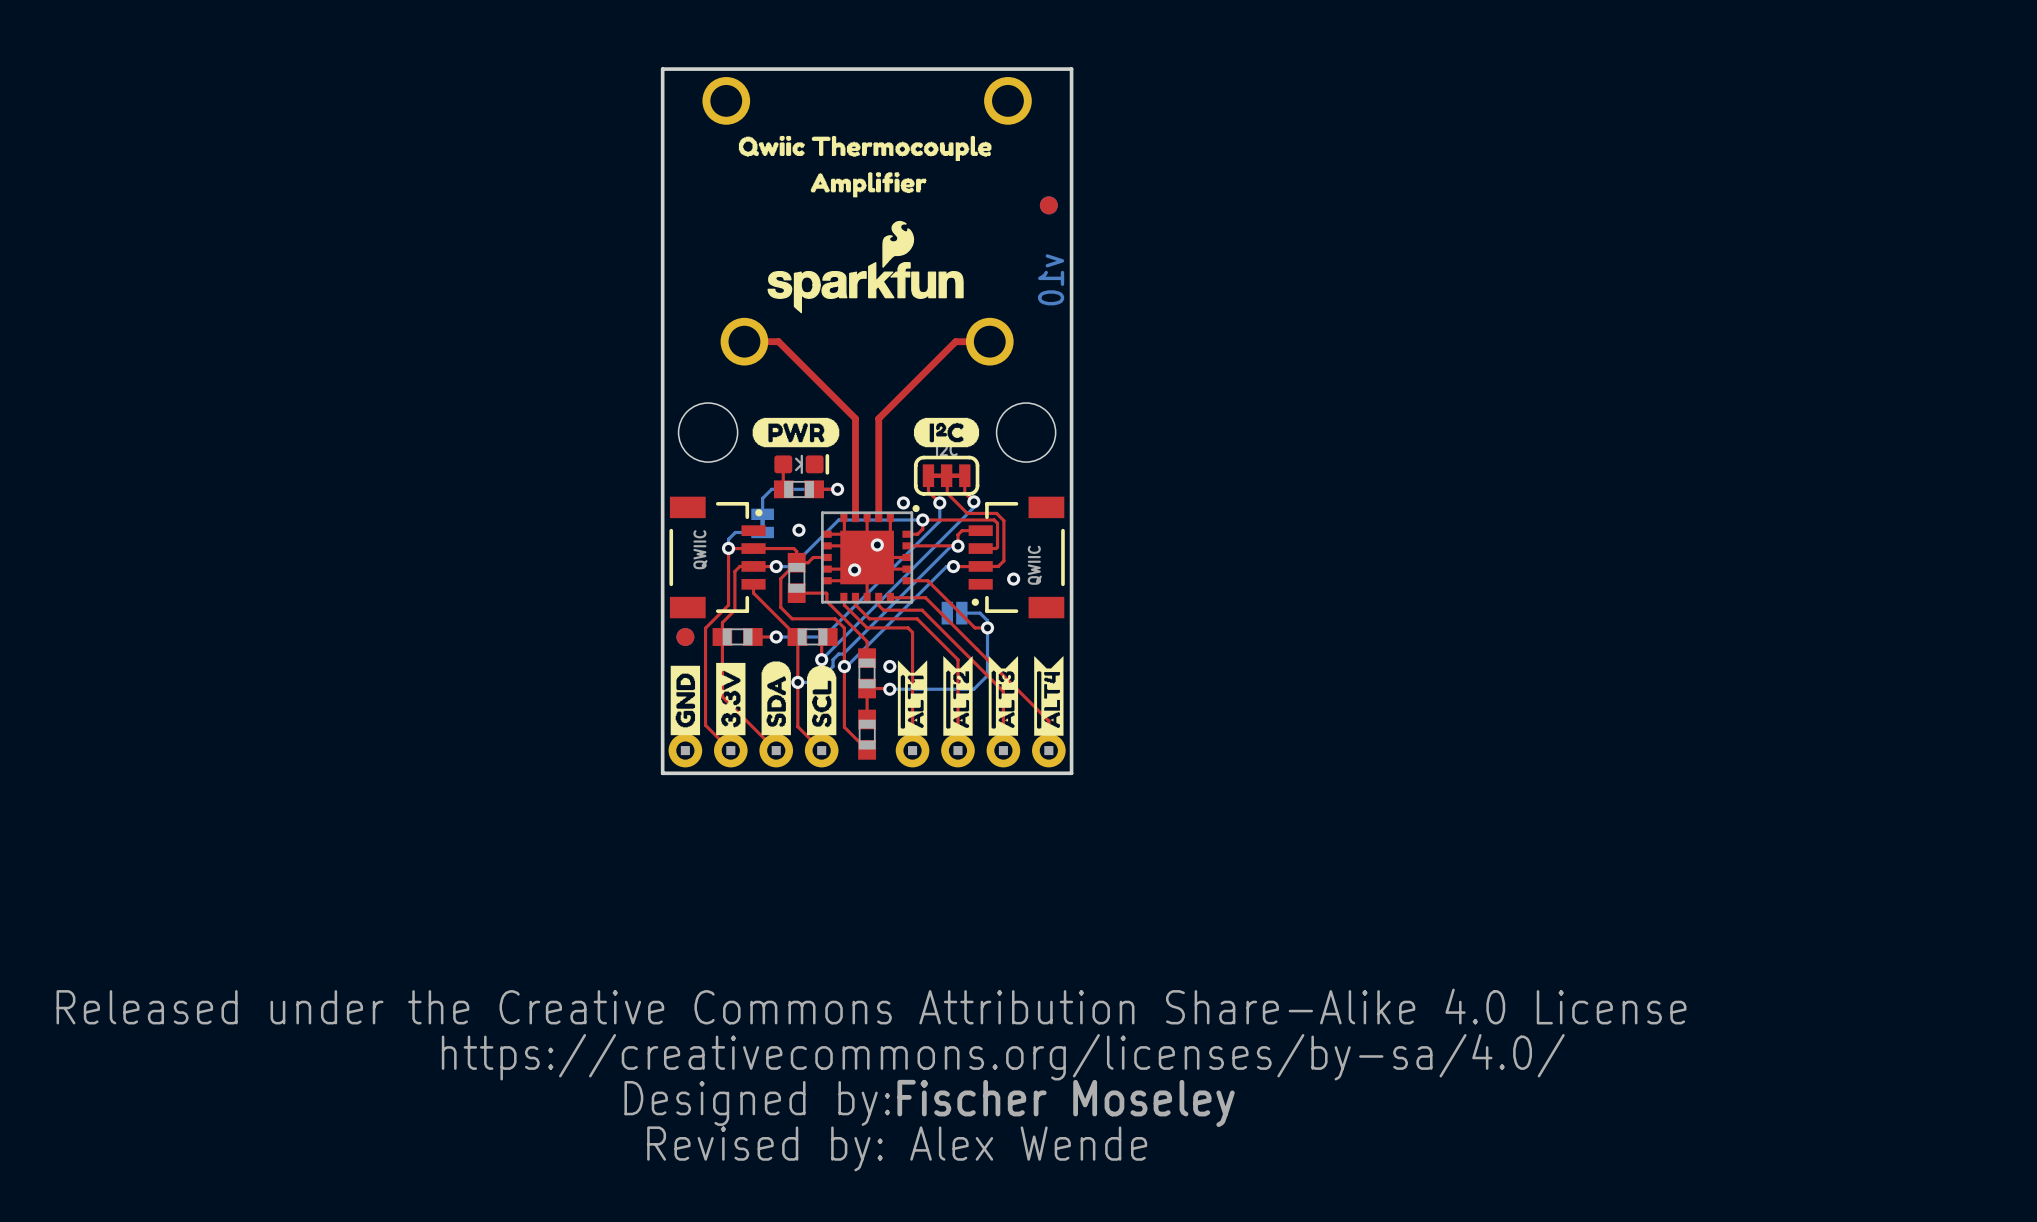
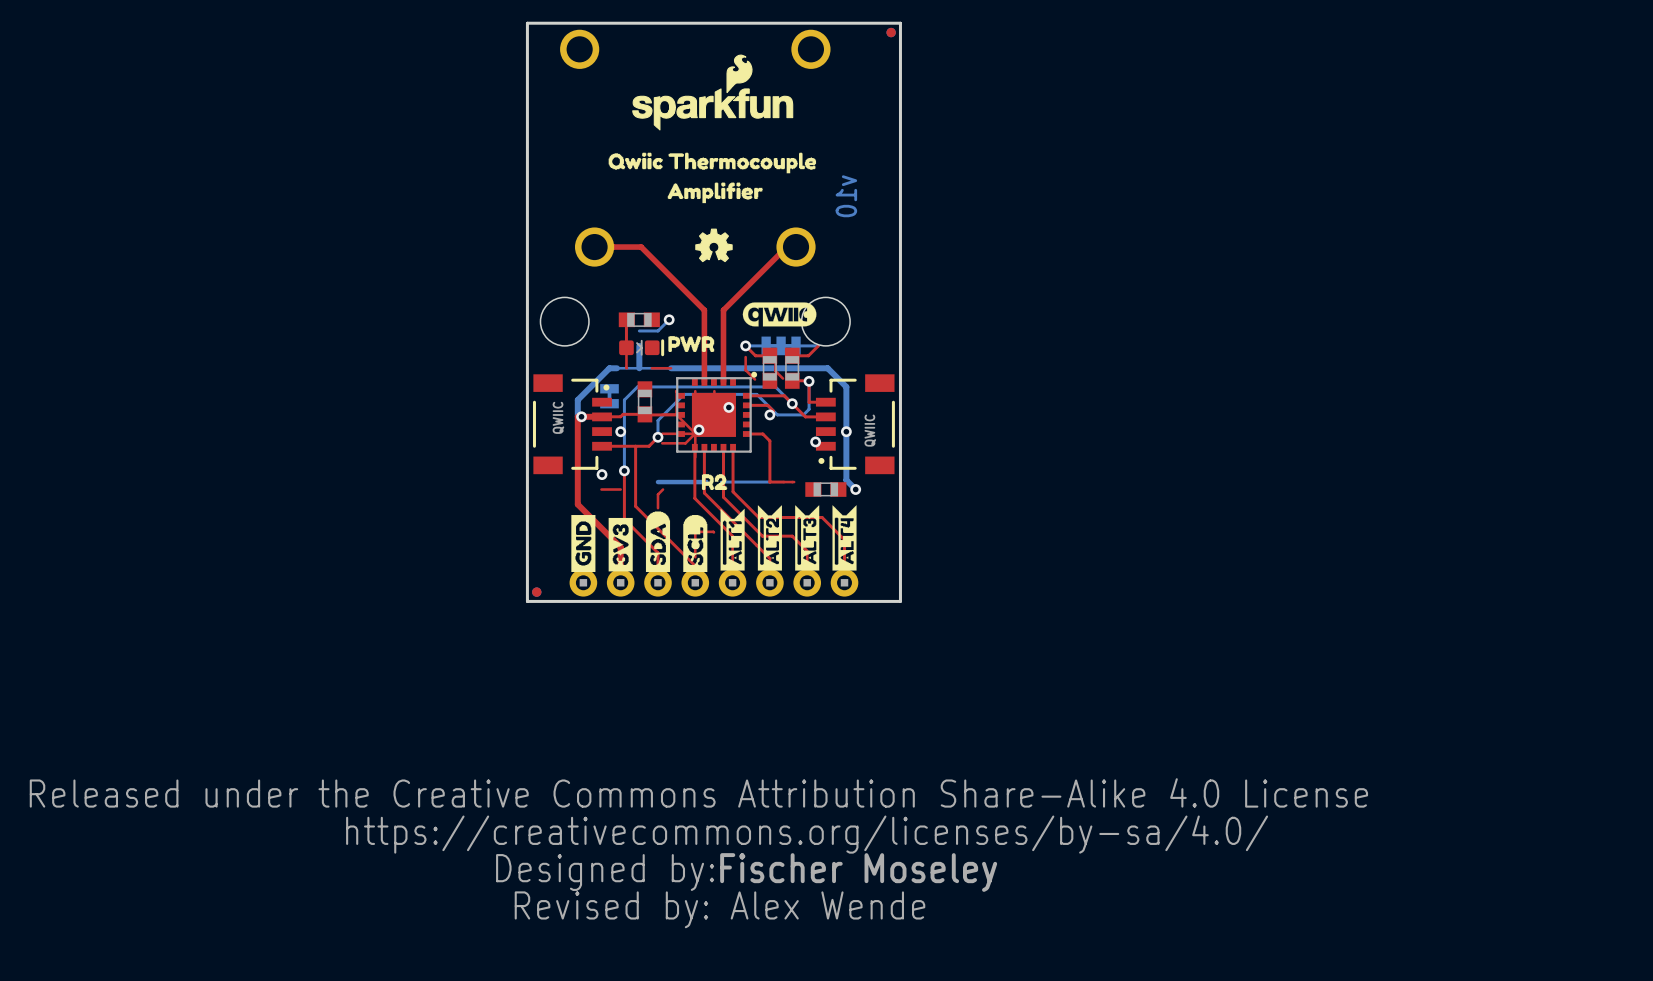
board edge: (1071, 69) (1071, 773) -> (863, 23) (900, 23) (900, 601) (863, 601)
part: none -> (891, 32)
drawing position: (865, 148) -> (712, 163)
drawing position: (868, 184) -> (715, 192)
part: (1048, 205) -> none
drawing position: (865, 267) -> (712, 92)
drawing: none -> [695, 228, 733, 263]
top track: (778, 341) (855, 418) (855, 517) -> (622, 247) (641, 247) (704, 310) (704, 381)
top track: (978, 341) (955, 341) (878, 418) (878, 517) -> (786, 247) (723, 310) (723, 381)
drawing: none -> [742, 302, 817, 327]
drawing: [752, 417, 840, 448] -> none
drawing: [913, 417, 980, 448] -> none
top track: none -> (626, 319) (626, 344)
part: none -> (639, 319)
bottom track: none -> (669, 319) (657, 330) (639, 330)
via: none -> (669, 319)
drawing: none -> [668, 336, 715, 352]
bottom track: none -> (639, 345) (639, 368)
top track: none -> (745, 345) (755, 355) (769, 355)
bottom track: none -> (745, 345) (766, 345)
via: none -> (745, 345)
bottom track: none -> (796, 345) (818, 345)
top track: none -> (818, 345) (808, 355) (792, 355)
top track: (946, 475) (947, 493) (967, 513) (996, 513) (1003, 520) (1003, 560) (998, 566) (953, 566) -> none
part side: top (946, 475) -> bottom (781, 345)
bottom track: (771, 489) (762, 498) (762, 514) -> (616, 368) (609, 368) (577, 399) (577, 416)
part: (798, 489) -> none
bottom track: none -> (671, 368) (827, 368) (846, 386) (846, 480) (855, 489)
via: (837, 489) -> none
part: none -> (769, 368)
part: none -> (792, 368)
bottom track: (973, 501) (973, 507) (821, 659) -> none
via: (973, 501) -> none
via: (903, 502) -> none
bottom track: (939, 502) (939, 521) (823, 636) (776, 636) -> none
via: (939, 502) -> none
top track: none -> (792, 380) (809, 380) (809, 402) (825, 402)
bottom track: none -> (809, 381) (809, 409) (803, 414) (777, 414) (756, 394) (684, 394) (657, 420) (657, 437)
via: none -> (809, 381)
bottom track: (922, 520) (838, 520) (792, 566) (776, 566) -> none
via: (922, 520) -> none
top track: none -> (746, 395) (784, 395) (805, 416) (825, 416)
via: (798, 530) -> none
part: none -> (644, 401)
top track: (980, 530) (962, 530) (957, 534) (957, 546) (907, 545) -> none
bottom track: (762, 532) (735, 532) (728, 539) (728, 548) -> none
bottom track: none -> (792, 403) (775, 386) (637, 386) (624, 399) (624, 470)
via: none -> (792, 403)
top track: (826, 534) (844, 534) -> none
top track: (907, 534) (917, 534) (922, 529) (922, 520) (994, 520) (997, 523) (997, 547) (980, 548) -> none
top track: none -> (746, 405) (767, 405) (773, 411)
via: none -> (728, 407)
via: (877, 544) -> none
top track: none -> (680, 414) (623, 414) (620, 416) (602, 416)
bottom track: (957, 546) (951, 546) (843, 654) (838, 654) (833, 659) (833, 666) (817, 682) (797, 682) -> none
top track: (728, 548) (728, 605) (705, 628) (705, 725) (730, 750) -> none
top track: (728, 548) (793, 548) (796, 551) (796, 562) -> none
part position: (870, 554) -> (716, 412)
top track: (826, 557) (813, 557) (808, 562) (796, 562) -> none
part position: (1016, 557) -> (855, 424)
top track: (796, 562) (780, 578) (780, 607) (792, 618) (835, 618) (844, 628) (844, 727) (867, 749) -> (635, 446) (635, 506) (695, 565) (695, 582)
via: none -> (699, 429)
top track: (776, 566) (739, 566) (734, 571) (734, 610) (722, 622) (722, 696) (776, 750) -> (601, 416) (577, 416) (577, 504) (620, 547) (620, 582)
bottom track: (953, 566) (946, 566) (846, 666) (844, 666) -> none
via: (953, 566) -> none
via: none -> (846, 431)
via: (854, 569) -> none
top track: none -> (657, 437) (649, 446) (602, 446)
via: none -> (657, 437)
part: (796, 577) -> none
top track: (907, 580) (927, 580) (974, 627) -> (746, 434) (762, 434) (769, 441) (769, 482) (783, 482)
top track: (753, 584) (753, 593) (797, 637) (797, 726) (821, 750) -> (624, 470) (624, 519) (657, 552) (657, 582)
top track: (796, 593) (826, 593) (826, 601) (867, 641) (867, 658) -> none
top track: (843, 597) (844, 605) (867, 627) (908, 627) (912, 632) (912, 693) -> (694, 447) (694, 498) (732, 536)
top track: (855, 597) (855, 604) (869, 618) (917, 618) (957, 659) (957, 721) -> (704, 447) (704, 493) (769, 558)
top track: (878, 597) (878, 605) (883, 610) (922, 610) (1003, 691) (1003, 711) -> (723, 447) (723, 497) (762, 536) (792, 536) (807, 551)
top track: (890, 597) (925, 597) (1048, 721) -> (733, 447) (733, 491) (758, 517) (822, 517) (844, 539) (844, 558)
part: (954, 613) -> none
bottom track: (961, 613) (980, 613) (987, 620) (987, 675) (973, 689) (889, 689) -> none
via: none -> (624, 470)
via: none -> (602, 474)
drawing: none -> [701, 474, 728, 490]
bottom track: none -> (657, 482) (706, 482)
bottom track: none -> (721, 482) (769, 482)
via: (987, 627) -> none
part: (685, 636) -> none
part: (737, 636) -> none
via: (776, 636) -> none
part: (812, 636) -> none
part: none -> (825, 489)
via: none -> (855, 489)
via: (821, 659) -> none
drawing: [716, 662, 746, 736] -> none
via: (844, 666) -> none
via: (889, 666) -> none
drawing: none -> [608, 517, 633, 572]
part: (867, 673) -> none
via: (797, 682) -> none
via: (889, 689) -> none
drawing position: (776, 698) -> (657, 541)
drawing position: (685, 700) -> (583, 543)
drawing position: (821, 700) -> (695, 543)
part: (867, 734) -> none
part position: (753, 750) -> (639, 582)
part: none -> (536, 592)

